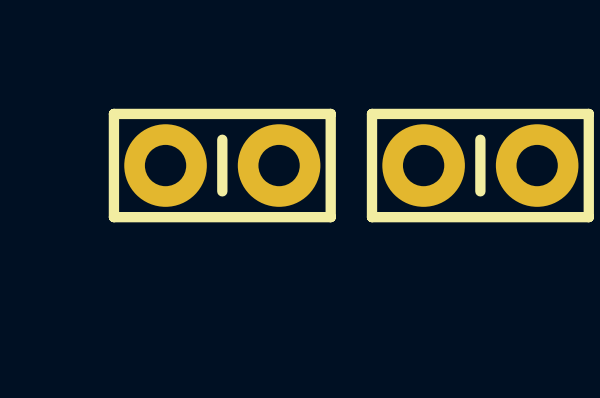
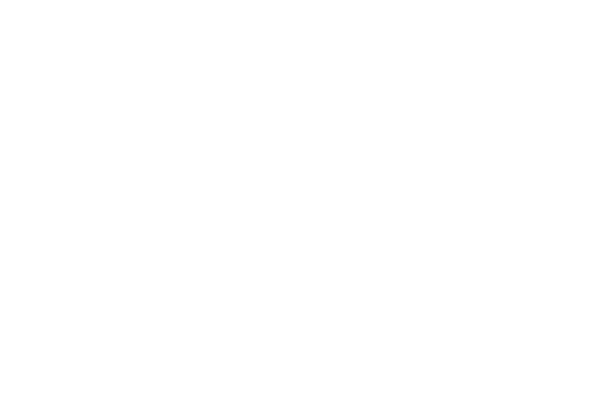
part: (222, 165) -> none
part: (480, 165) -> none

